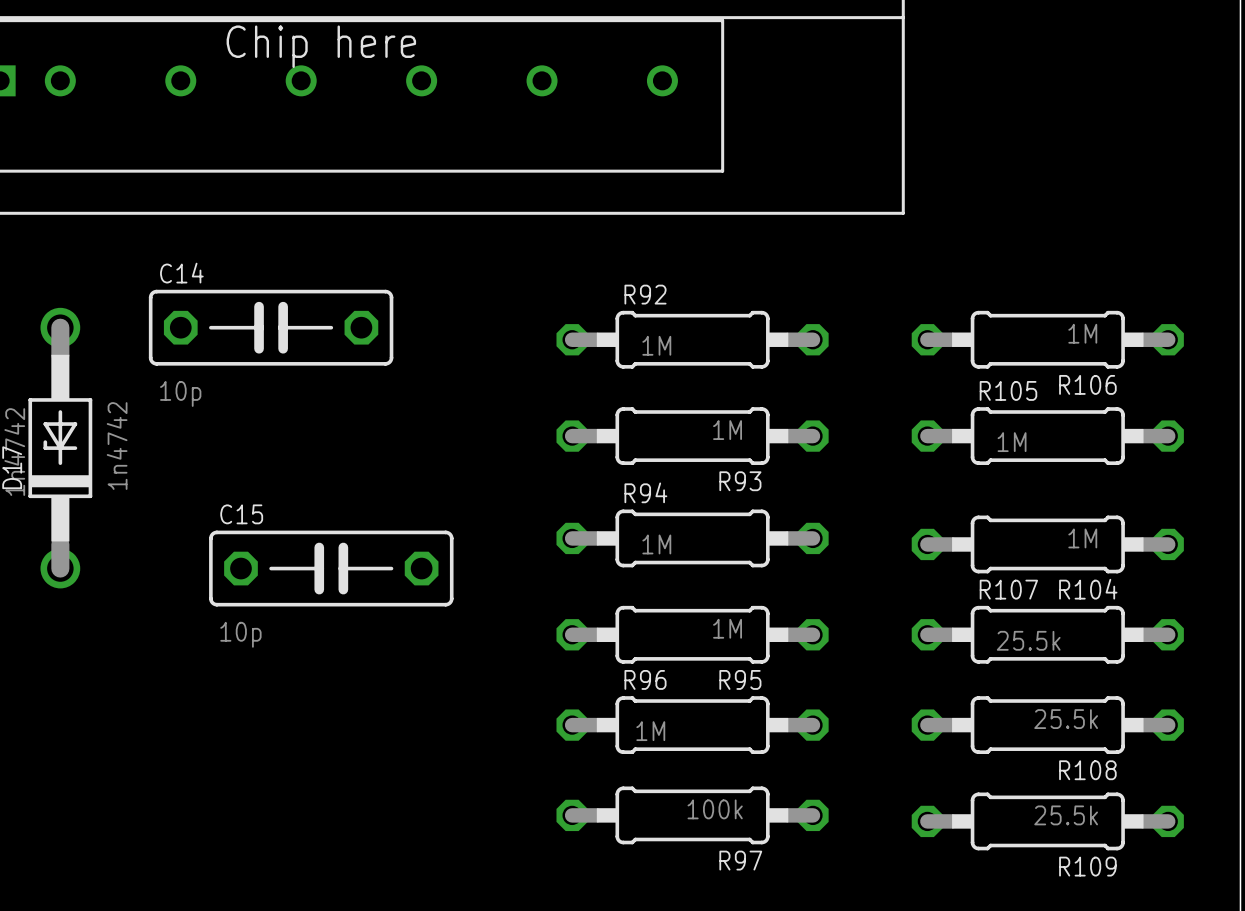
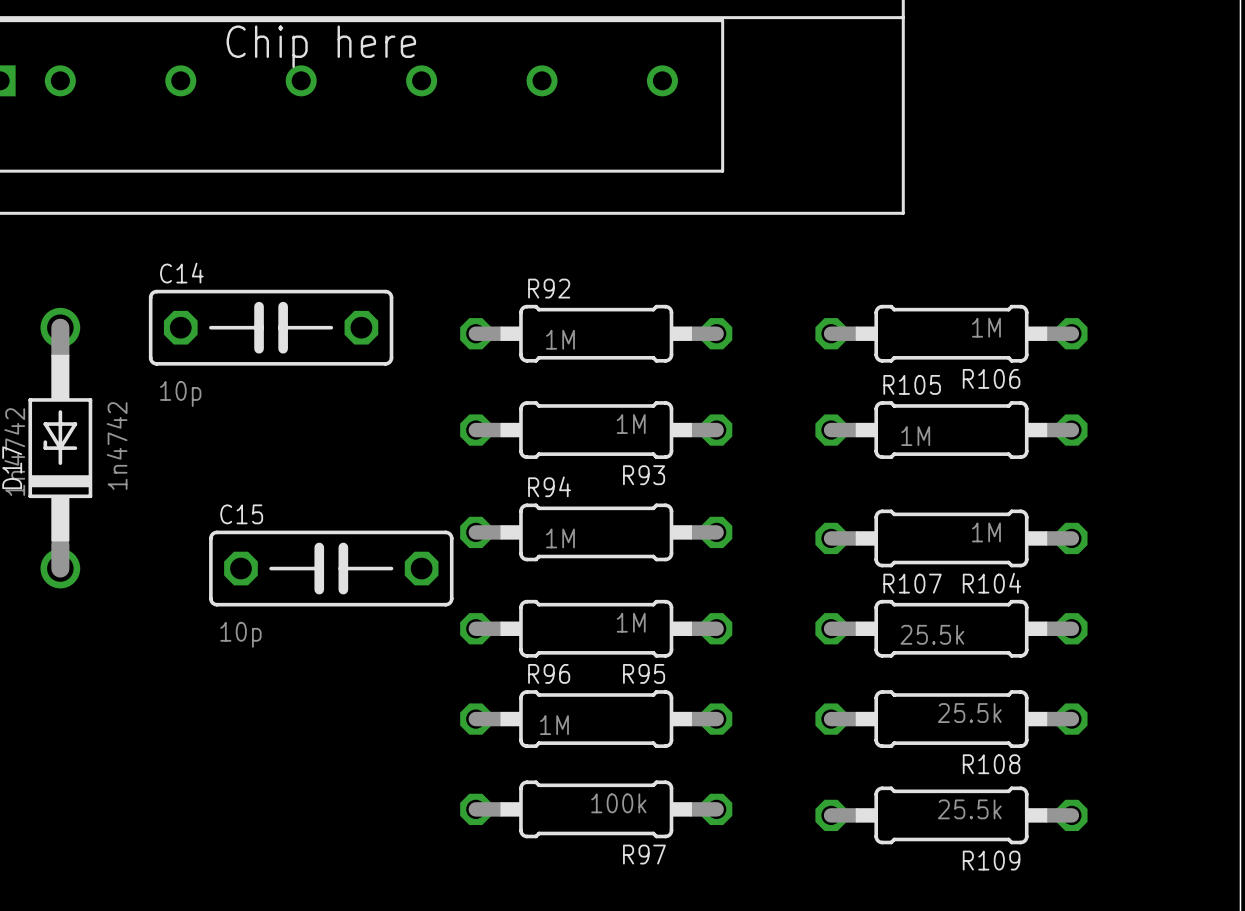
R92 position: (692, 339) -> (596, 333)
R106 position: (1047, 339) -> (951, 333)
R93 position: (692, 436) -> (596, 430)
R105 position: (1047, 436) -> (951, 430)
R94 position: (692, 538) -> (596, 532)
R104 position: (1047, 544) -> (951, 538)
R95 position: (692, 634) -> (596, 628)
R107 position: (1047, 634) -> (951, 628)
R96 position: (692, 725) -> (596, 719)
R108 position: (1047, 725) -> (951, 719)
R97 position: (692, 815) -> (596, 809)
R109 position: (1047, 821) -> (951, 815)

